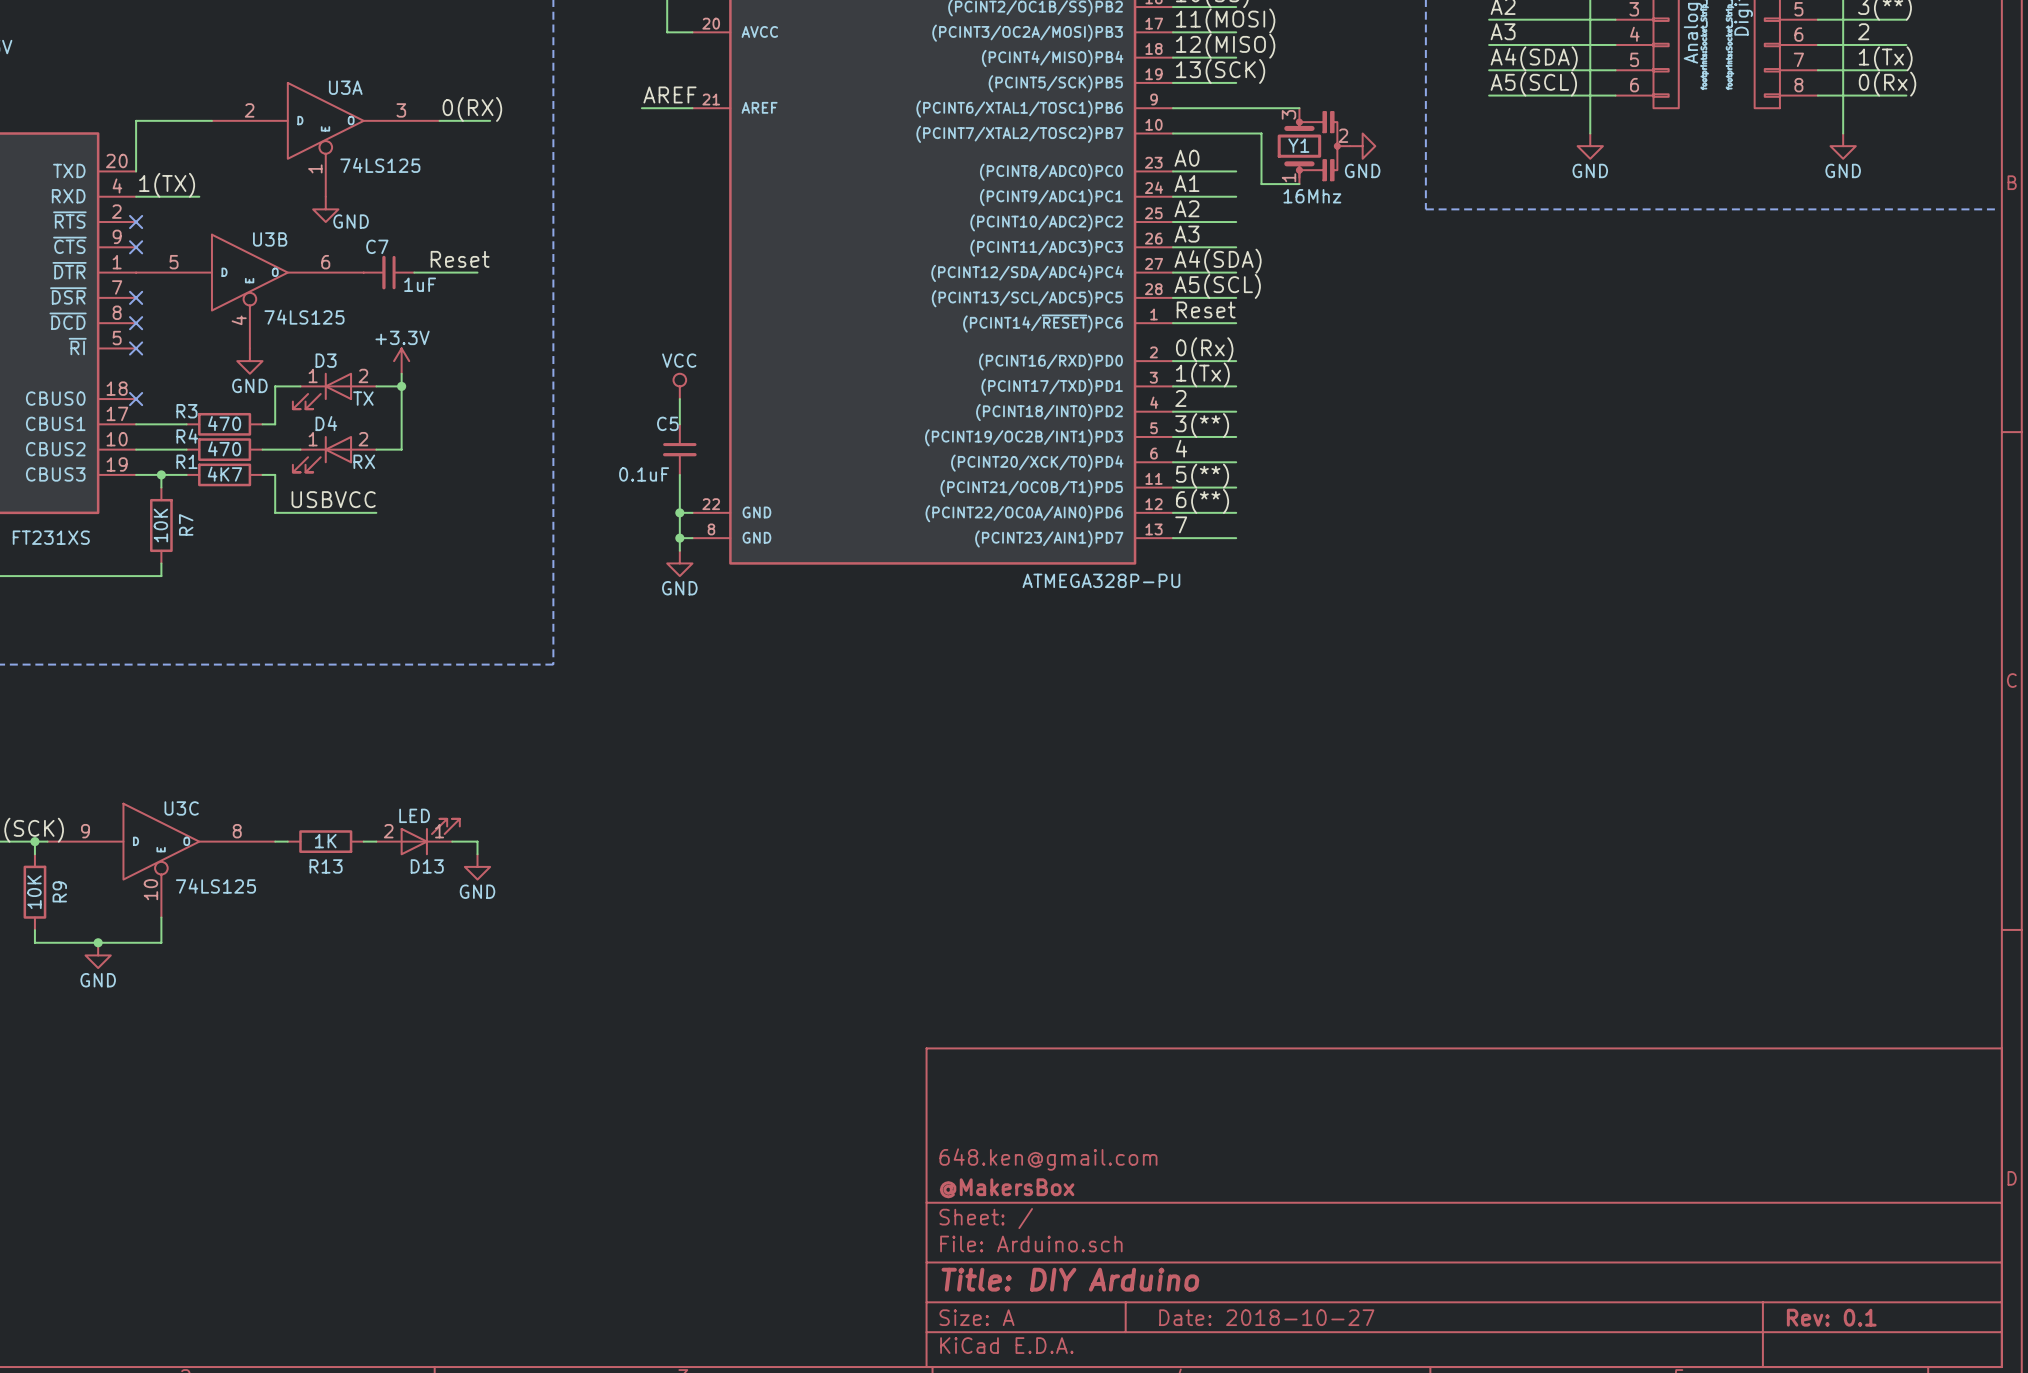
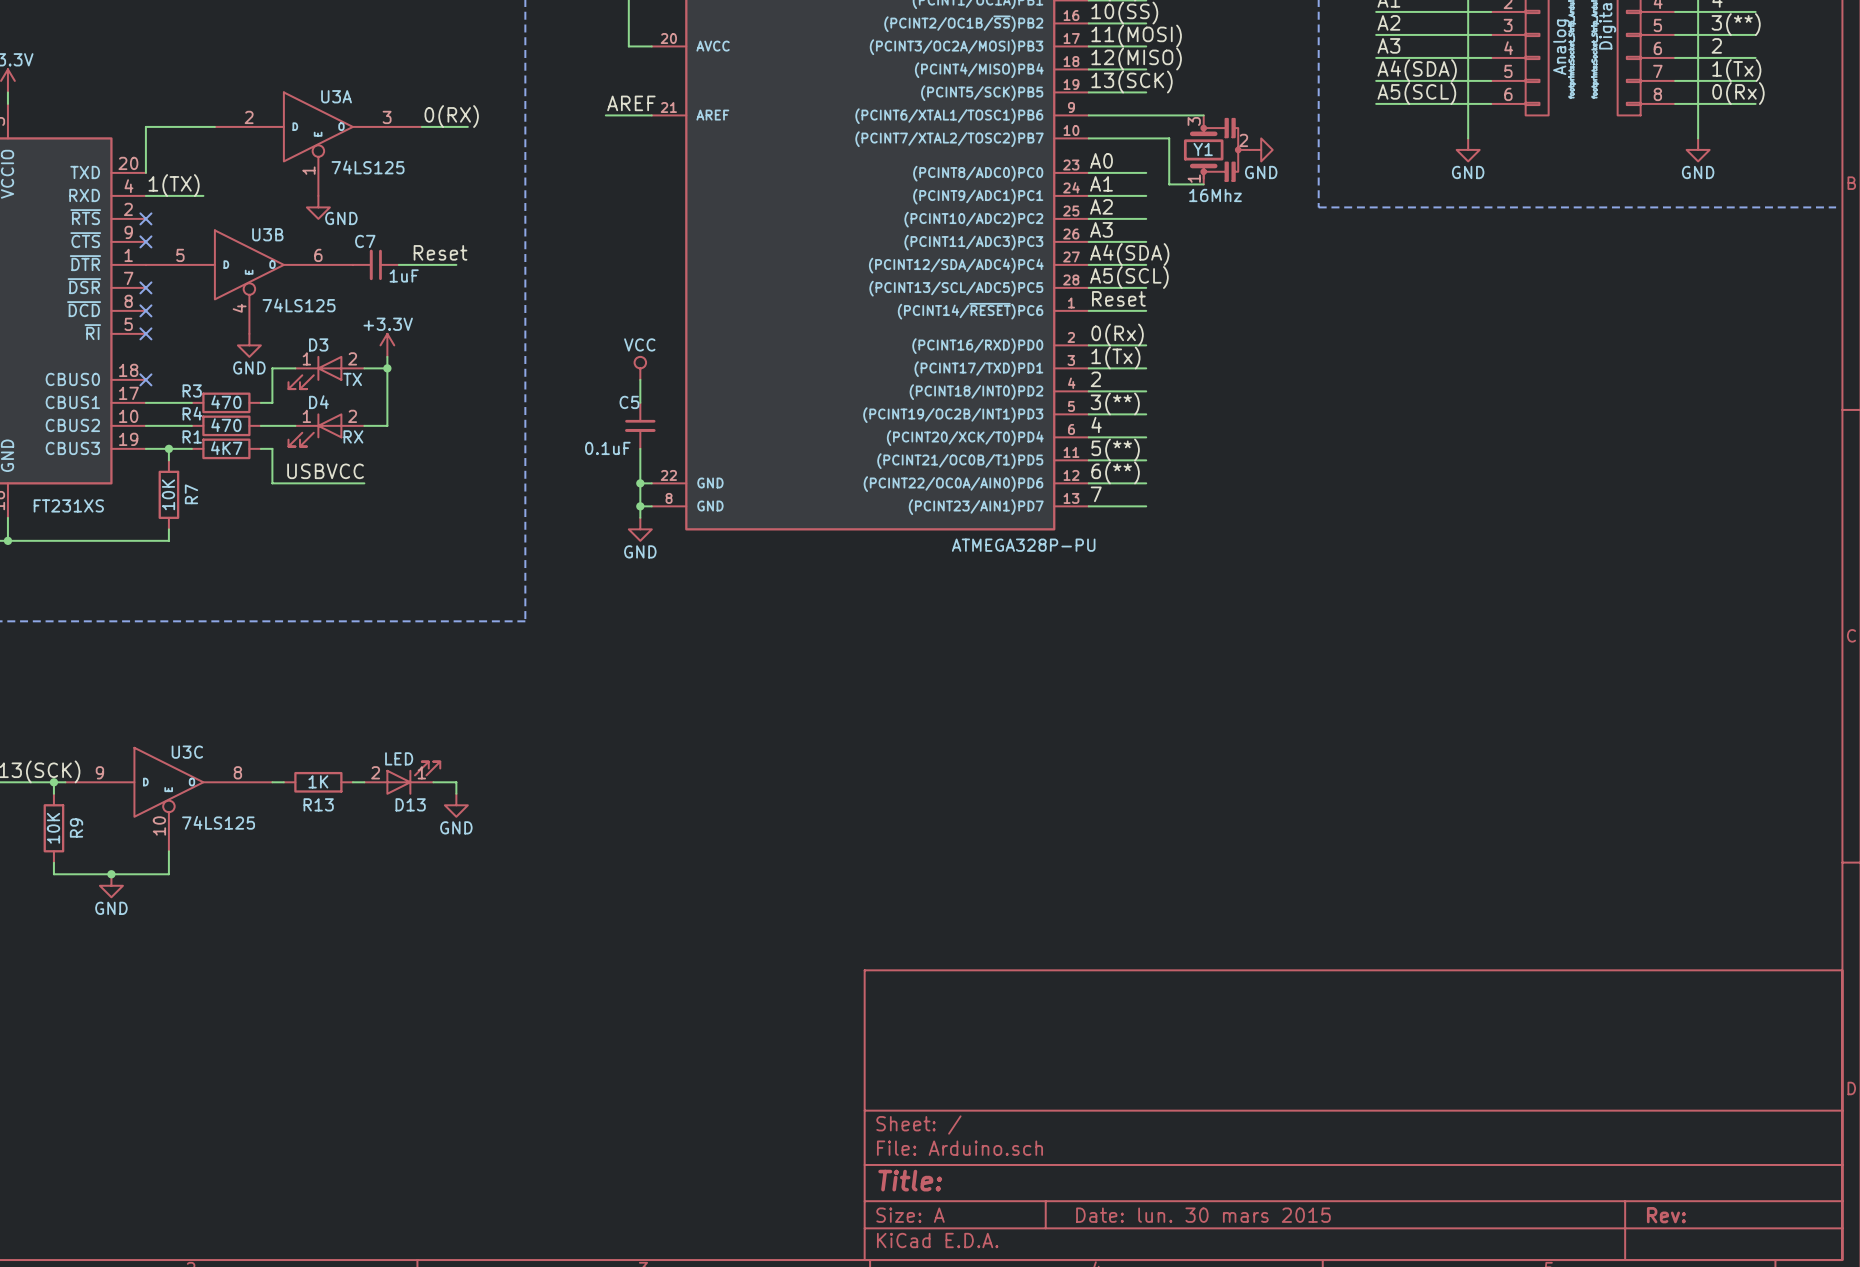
title block: 648.ken@gmail.com (1048, 1159) -> none
title block: @MakersBox (1007, 1188) -> none
title block: Title: DIY Arduino (1070, 1279) -> Title: (910, 1180)
title block: Date: 2018-10-27 (1266, 1317) -> Date: lun. 30 mars 2015 (1203, 1215)
title block: Rev: 0.1 (1831, 1317) -> Rev: (1666, 1215)

